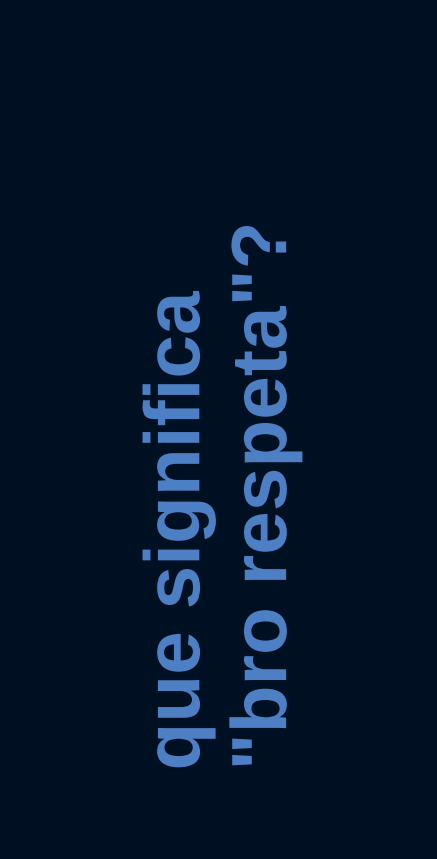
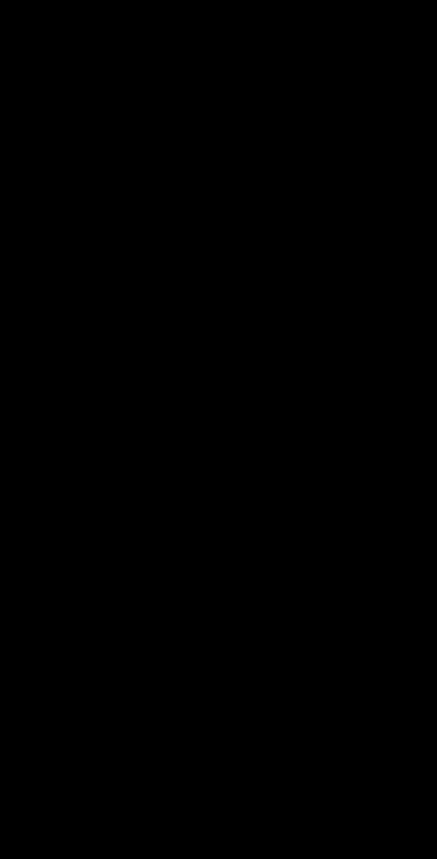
text: "bro respeta"? (265, 495) -> none
text: que significa (179, 529) -> none

